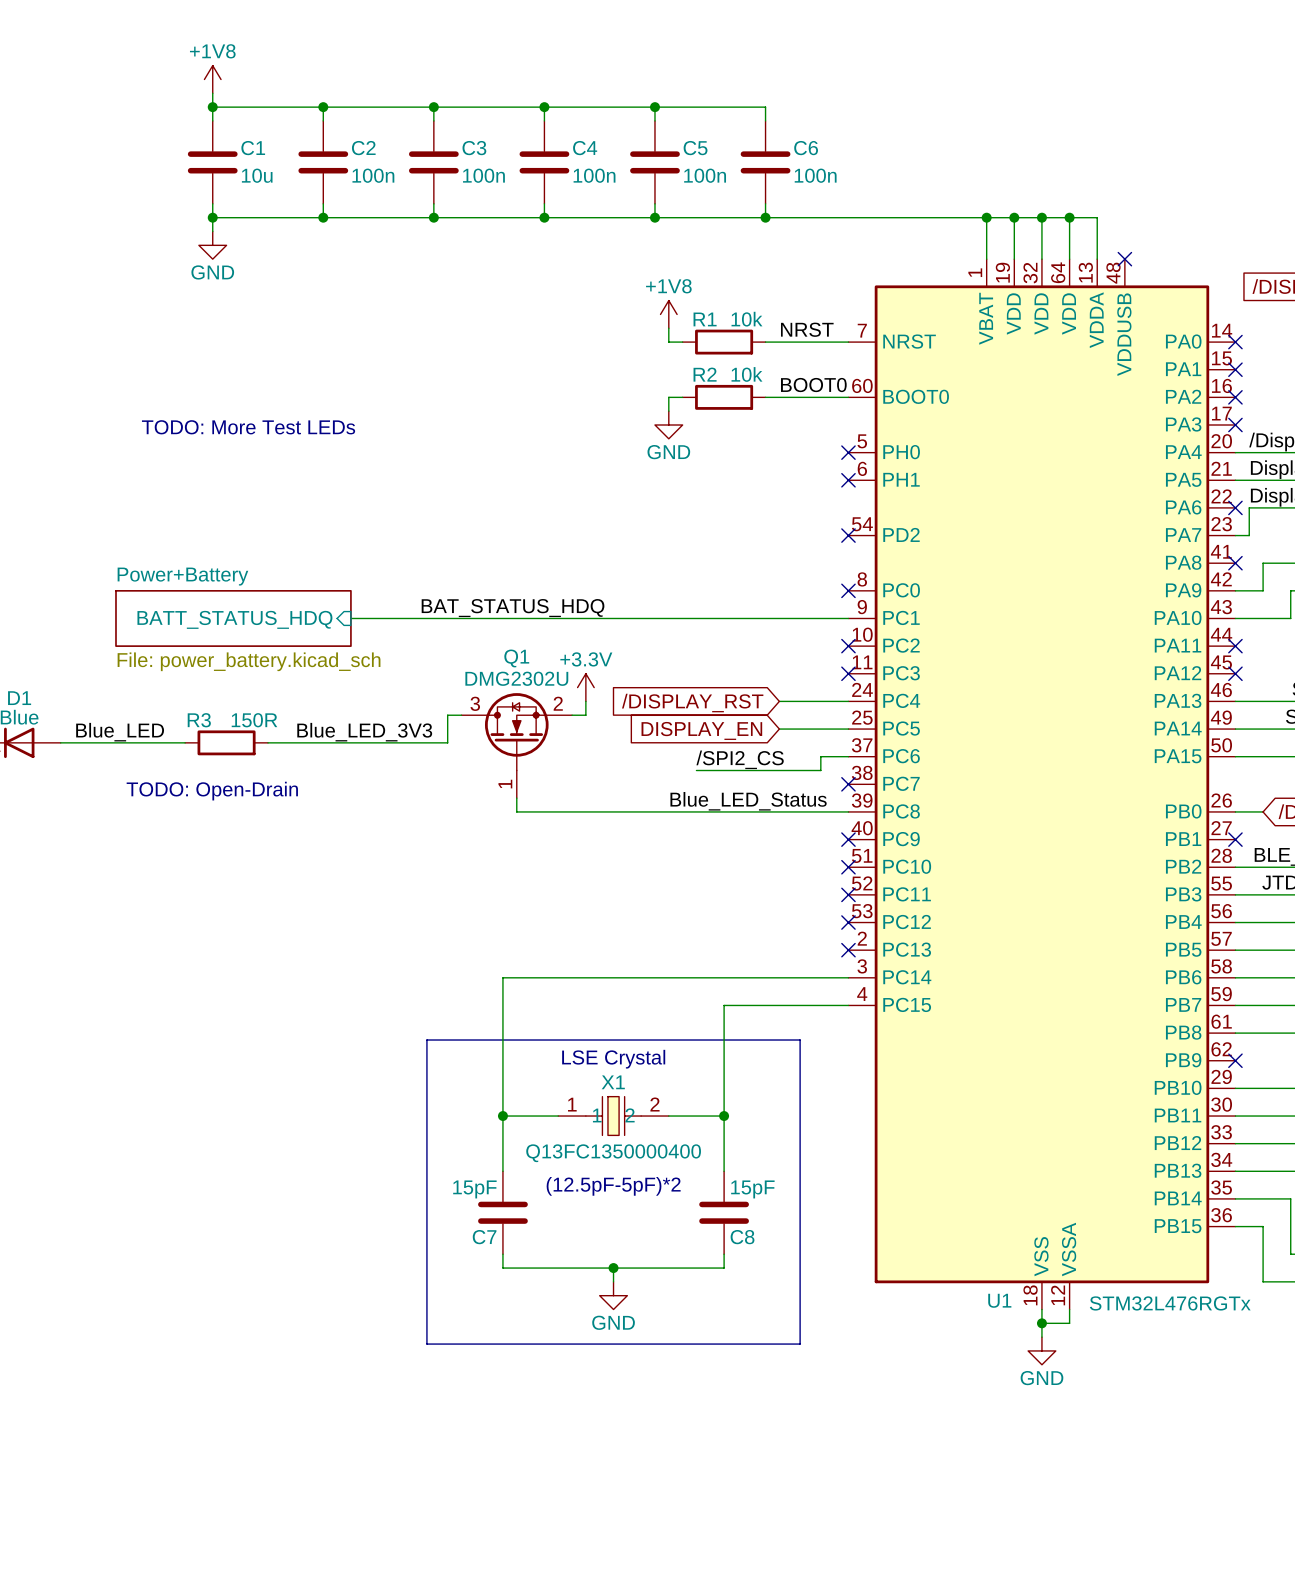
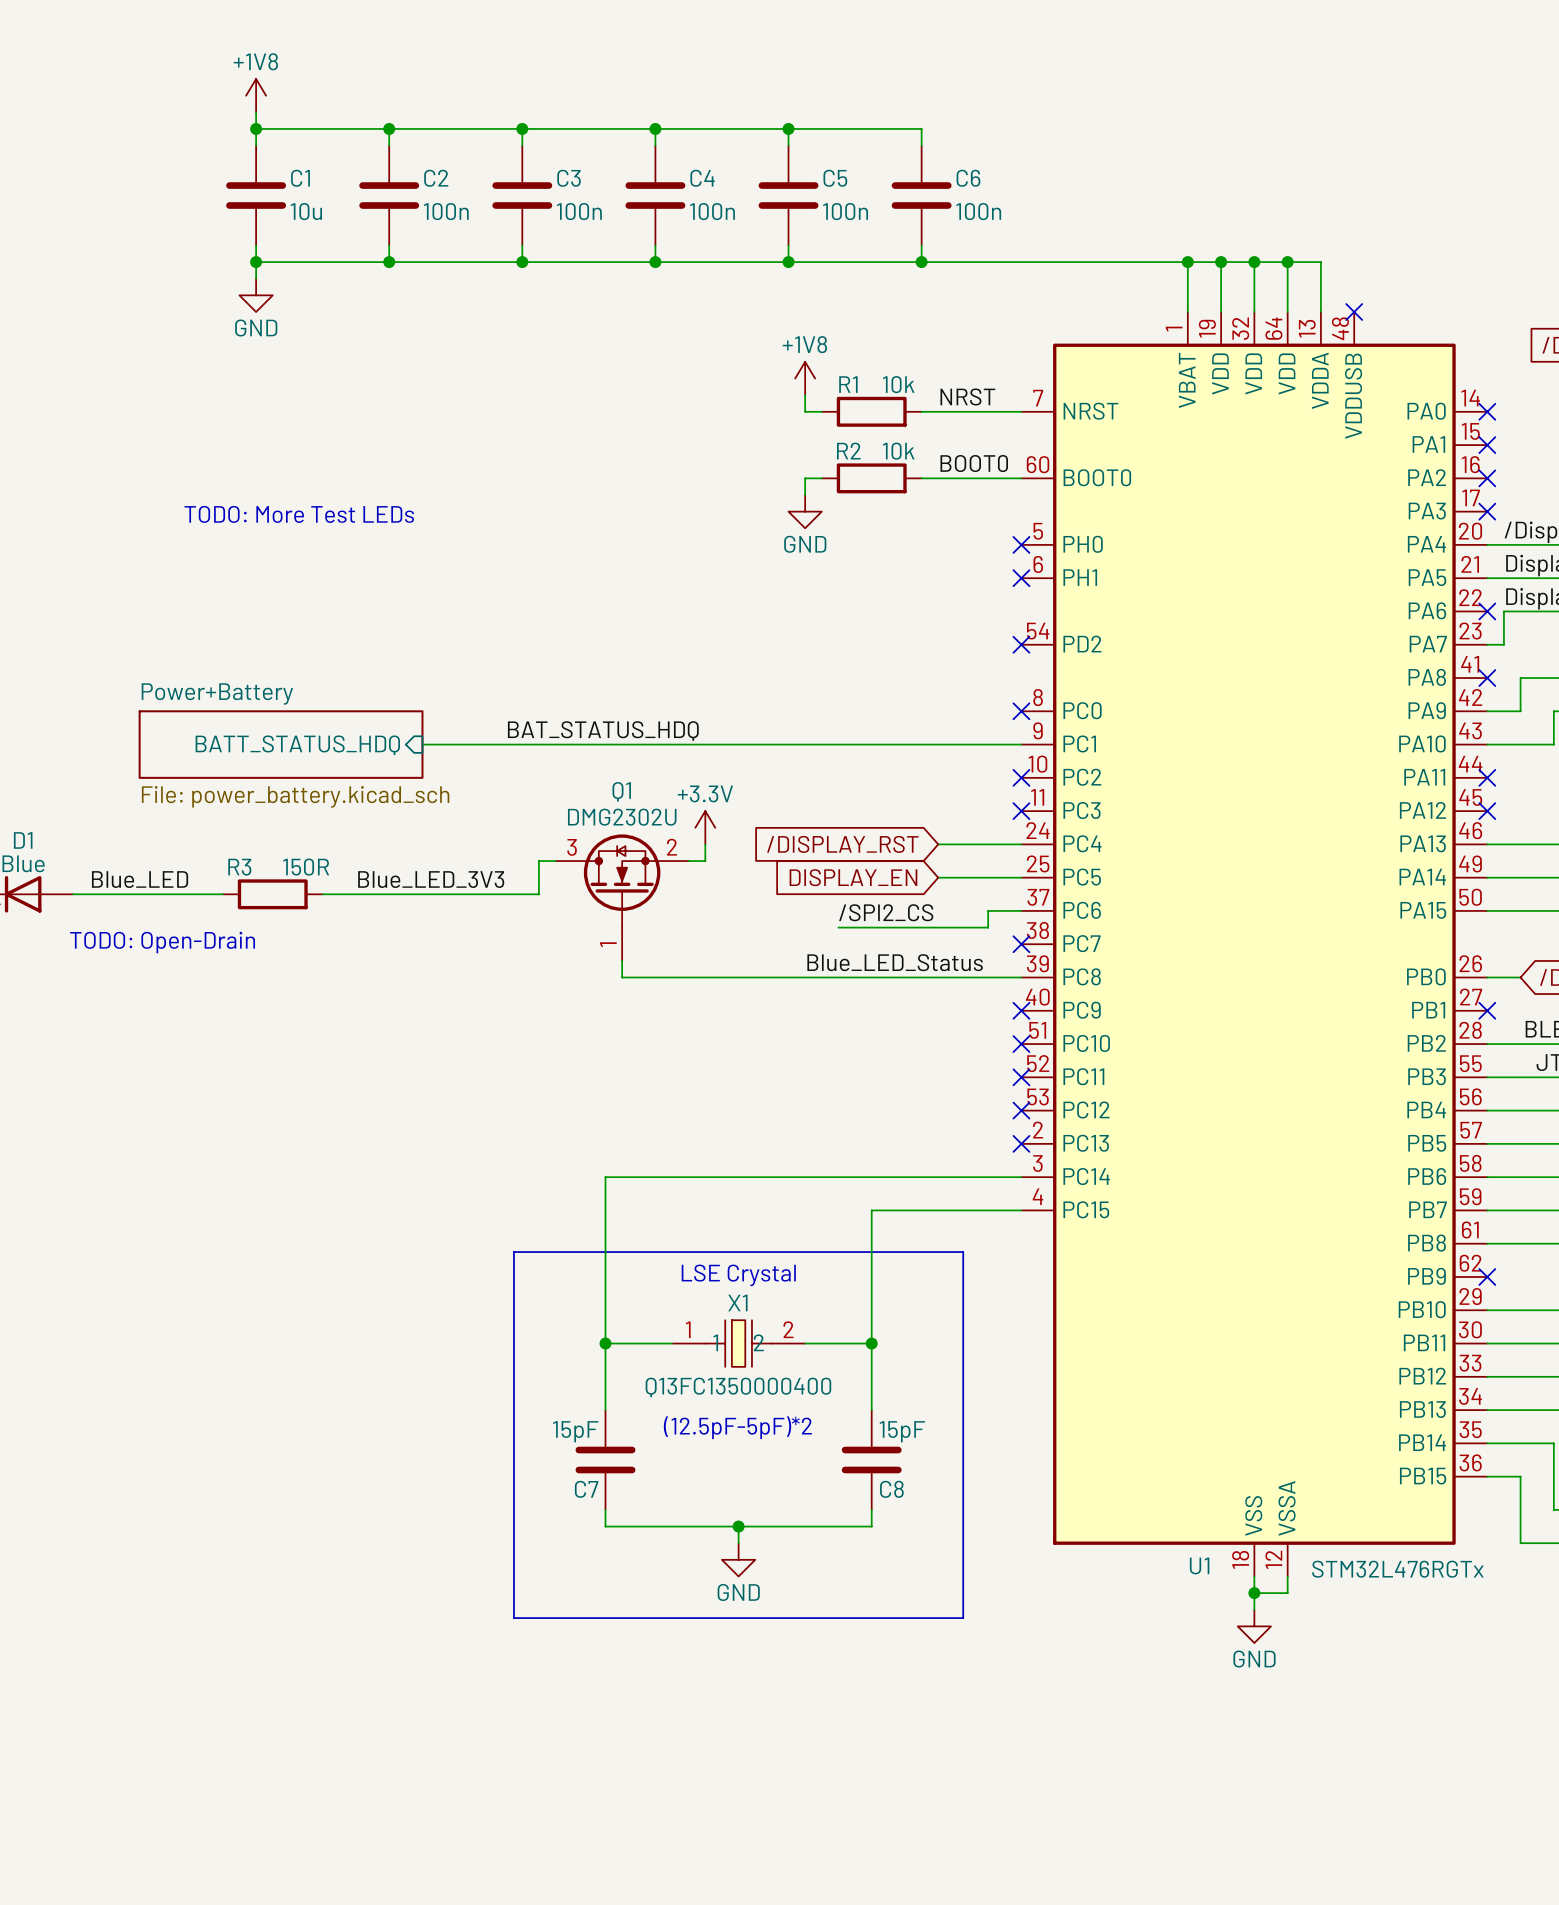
text position: TODO: Open-Drain (212, 791) -> TODO: Open-Drain (162, 942)

